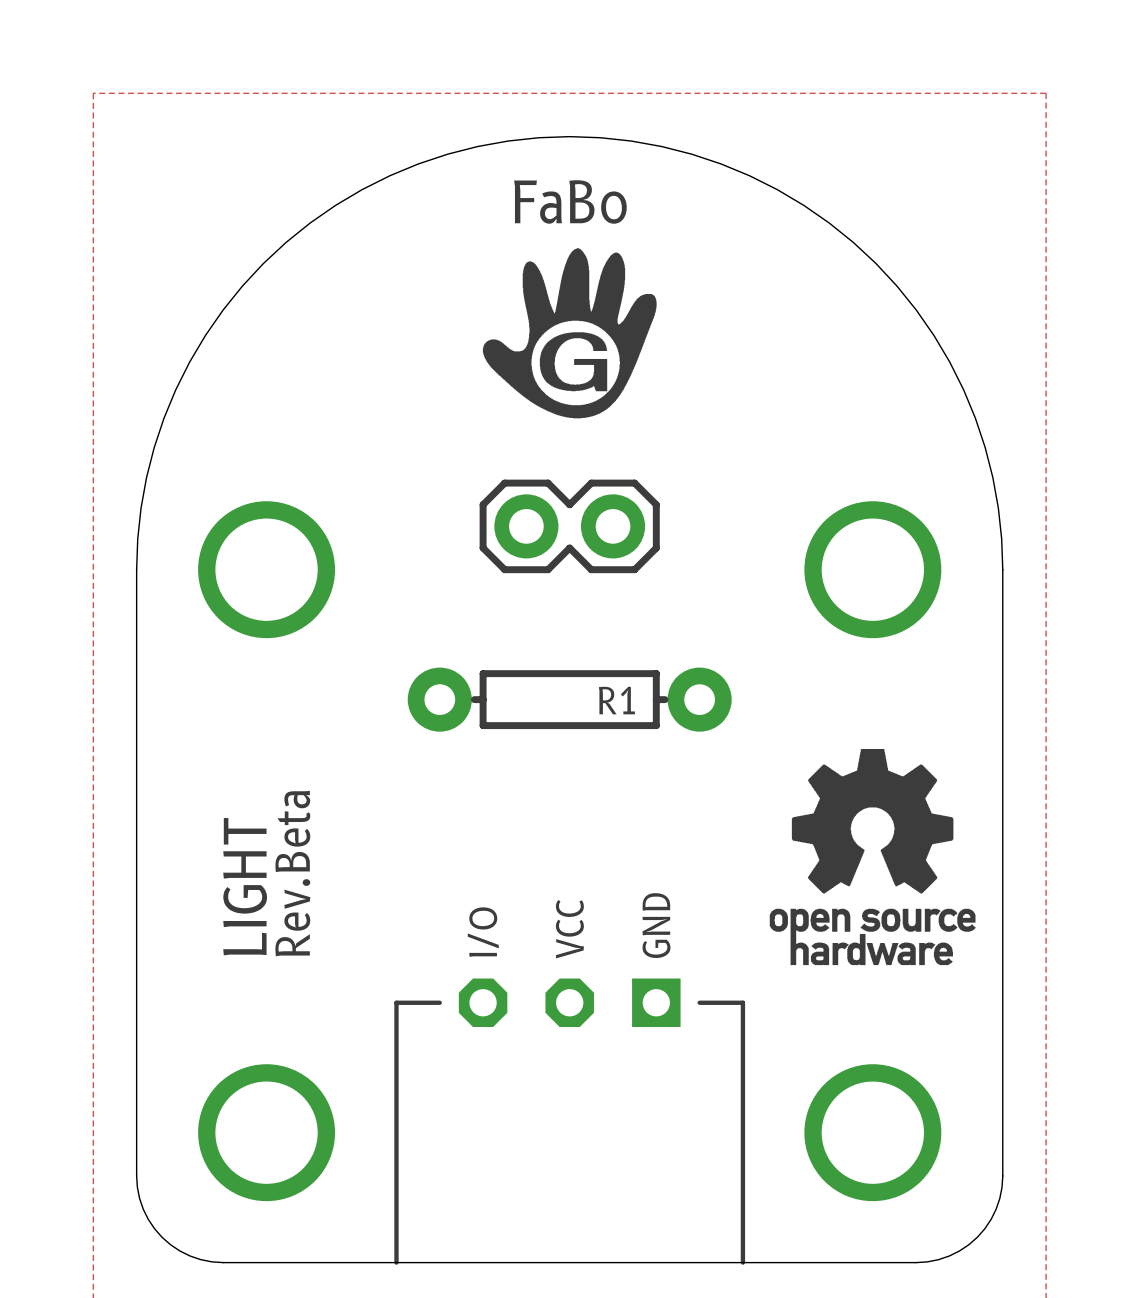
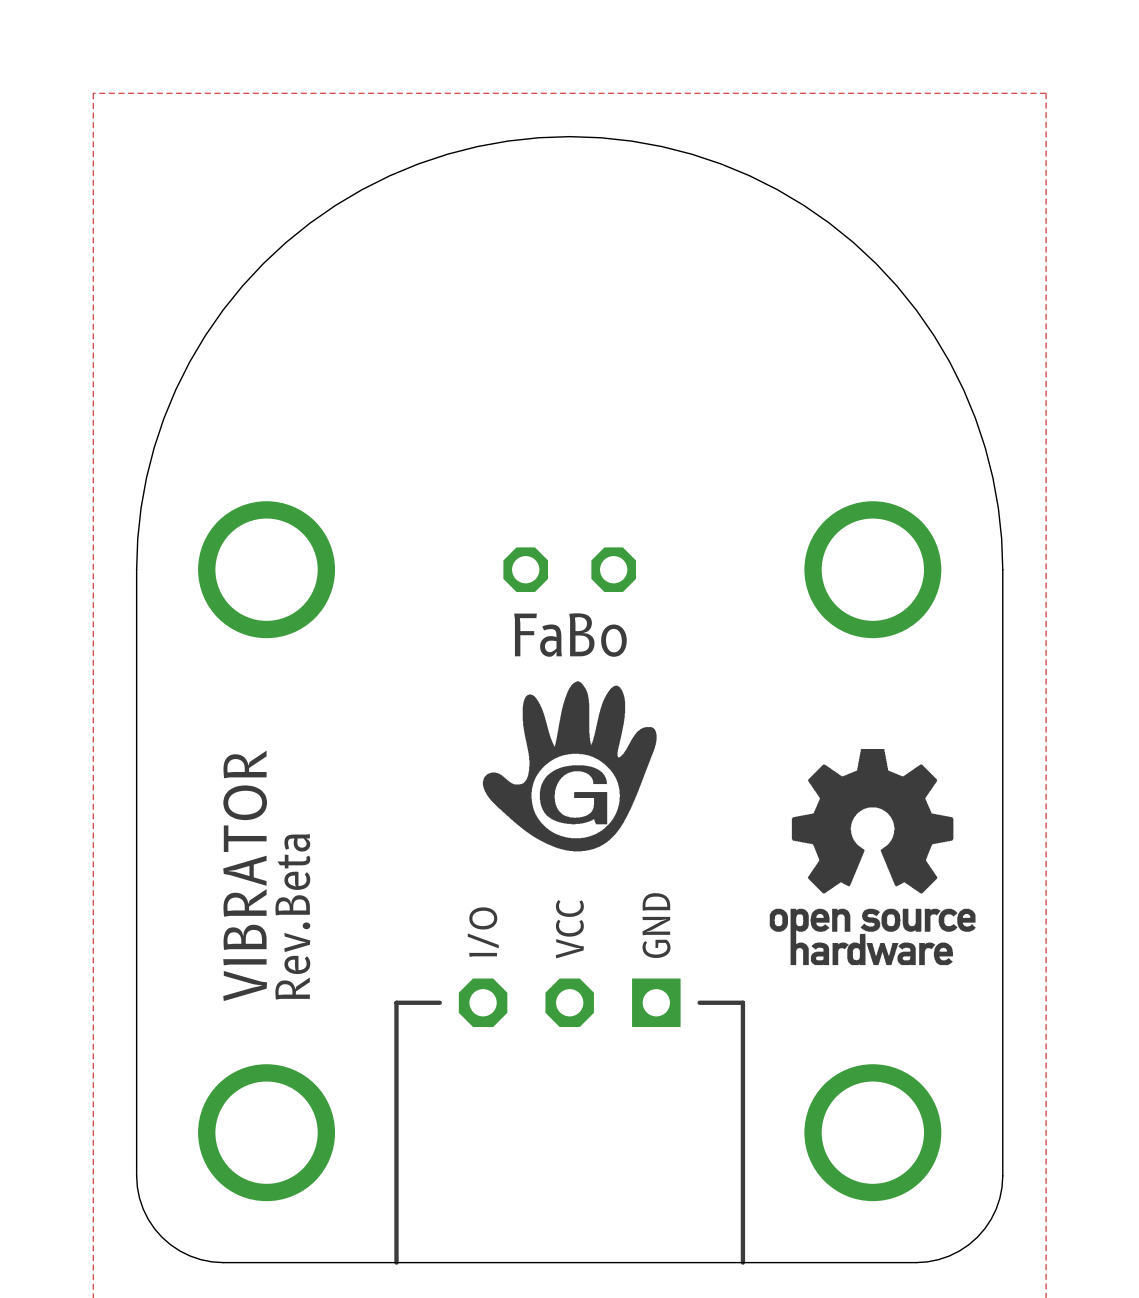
drawing position: (569, 333) -> (569, 766)
part: (569, 526) -> none
part: none -> (569, 569)
R1: (569, 699) -> none
text position: Rev.Beta (292, 873) -> Rev.Beta (292, 916)
text: none -> VIBRATOR (245, 875)
text: LIGHT (245, 886) -> none

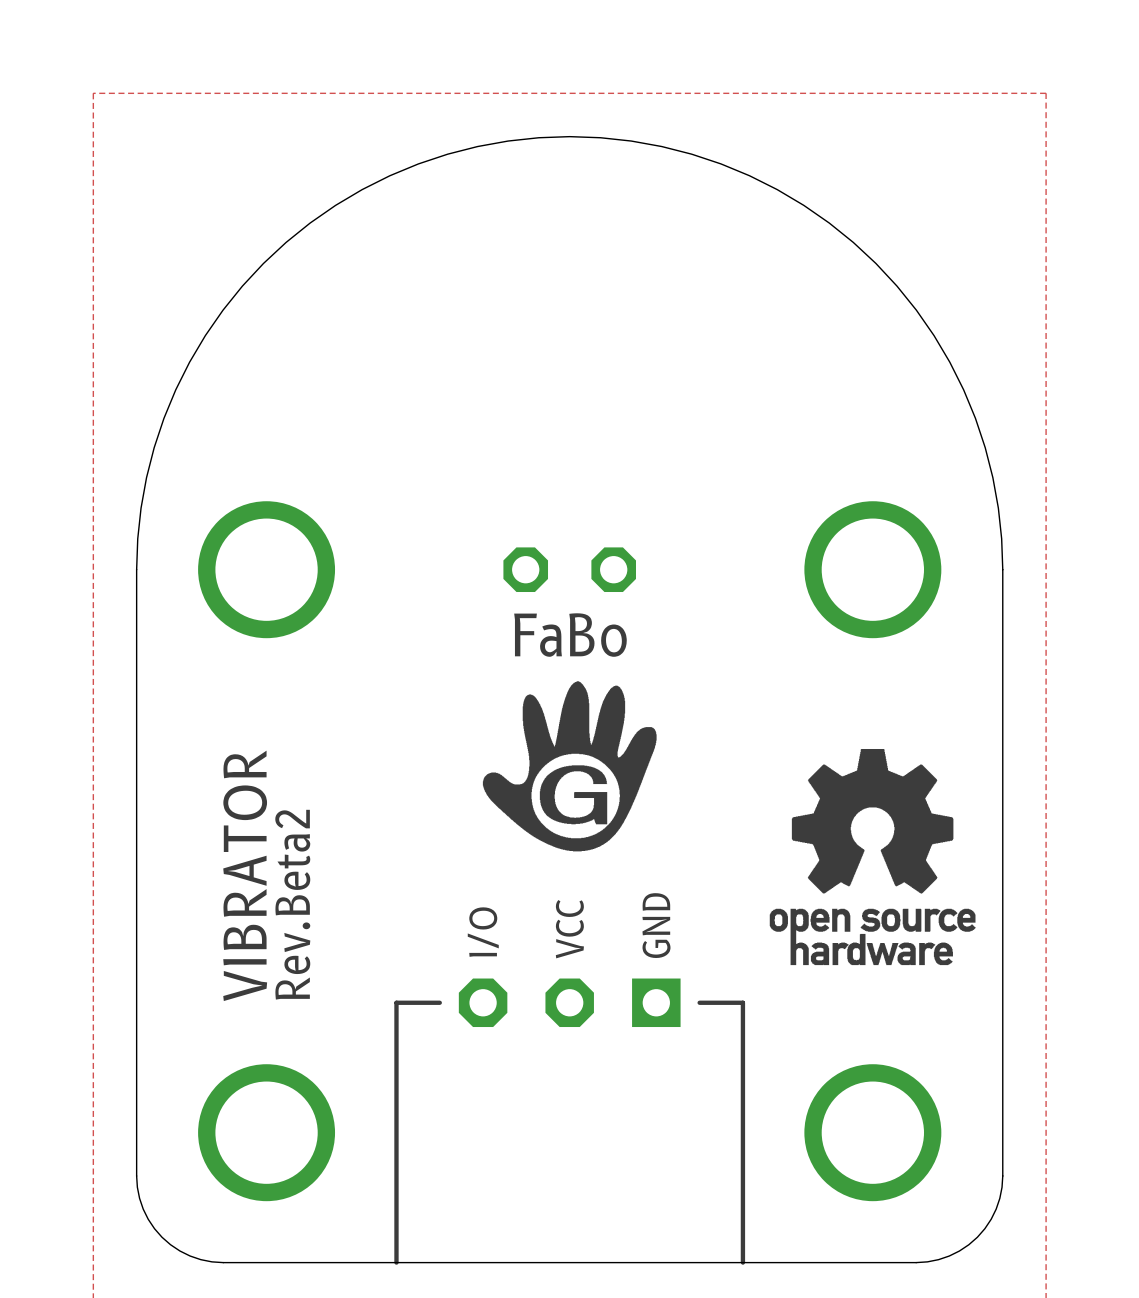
text: Rev.Beta (292, 916) -> Rev.Beta2 (292, 904)

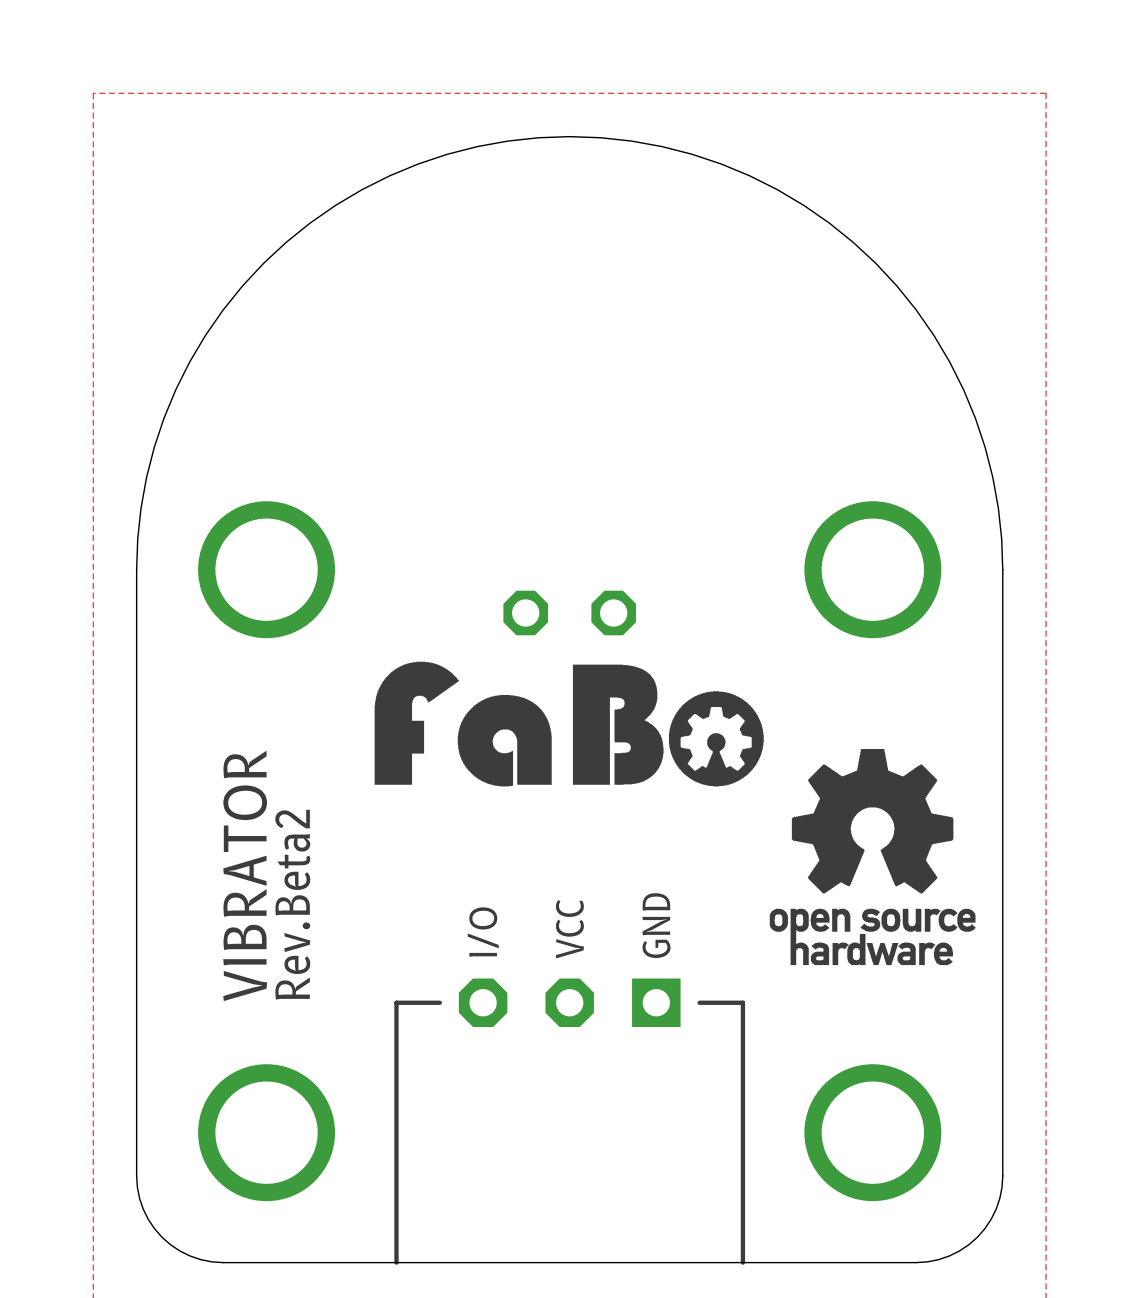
part position: (569, 569) -> (569, 613)
drawing: none -> [374, 661, 764, 787]
drawing: [482, 681, 657, 852] -> none

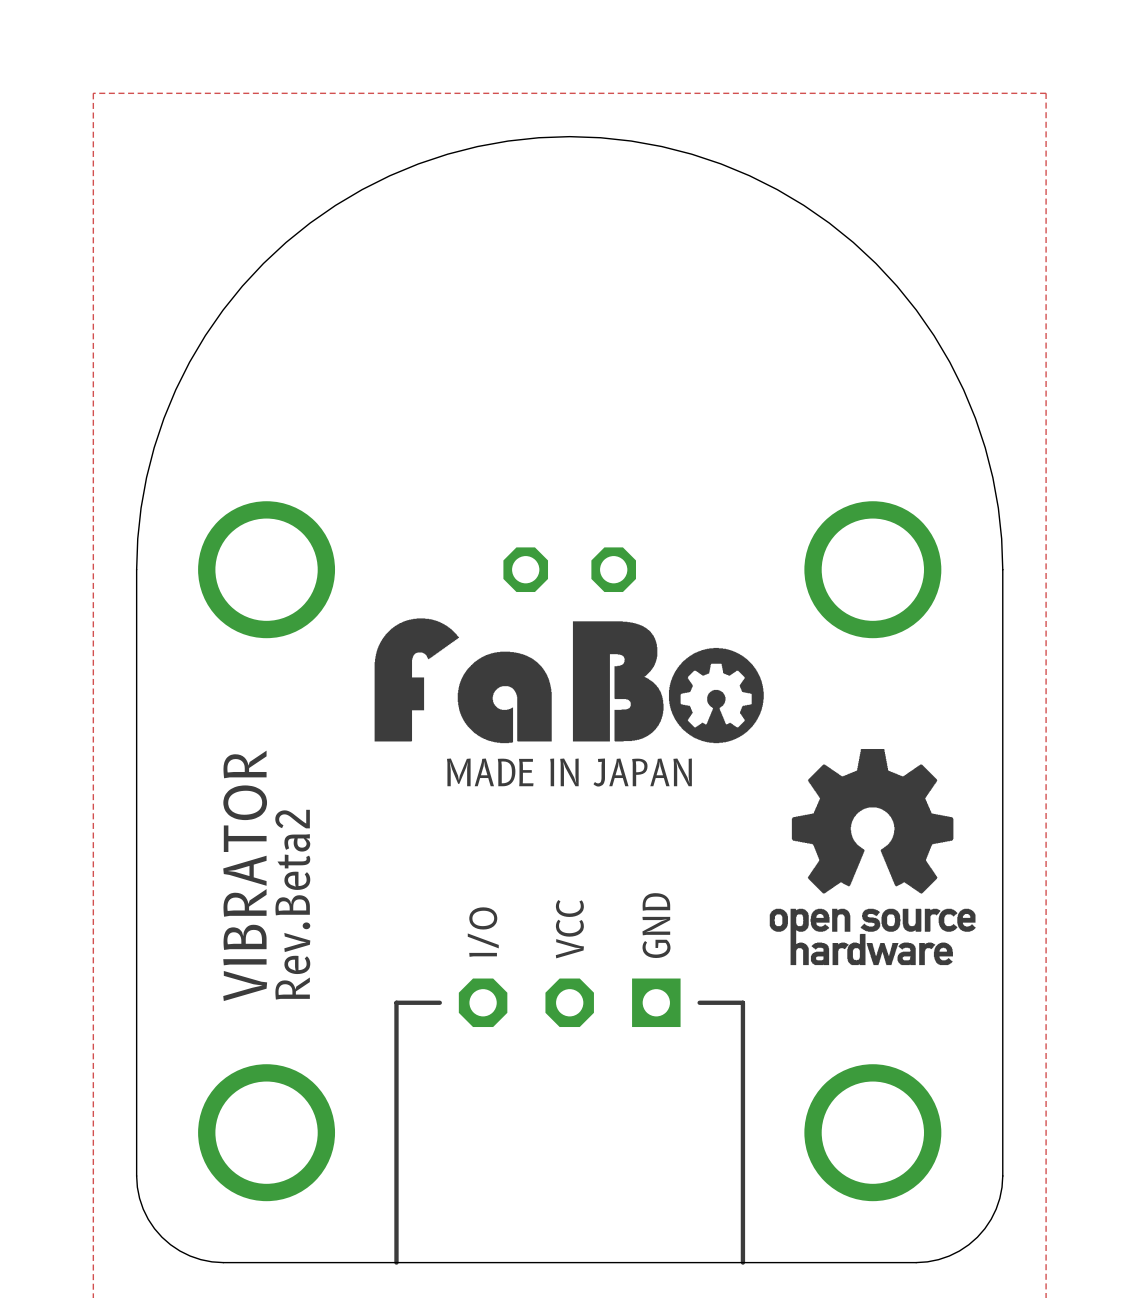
part position: (569, 613) -> (569, 569)
drawing position: (569, 724) -> (569, 680)
text: none -> MADE IN JAPAN (569, 772)

